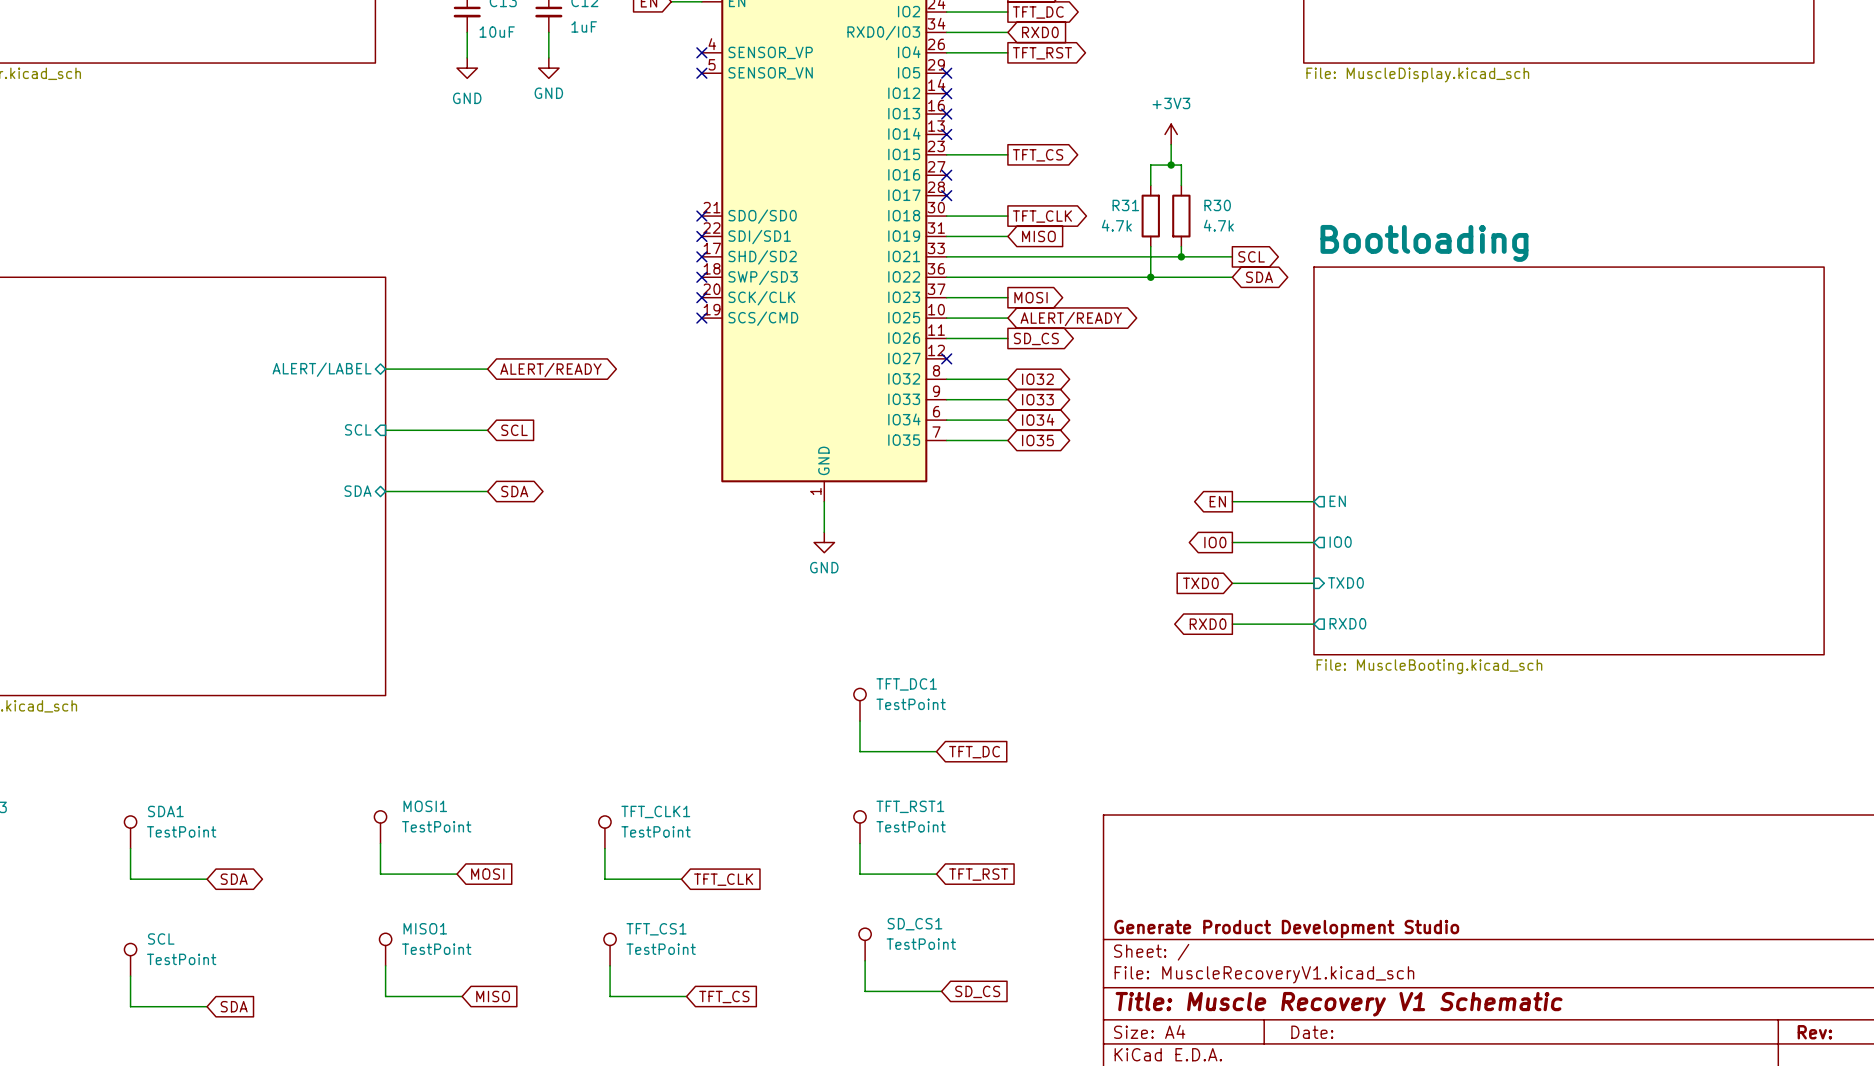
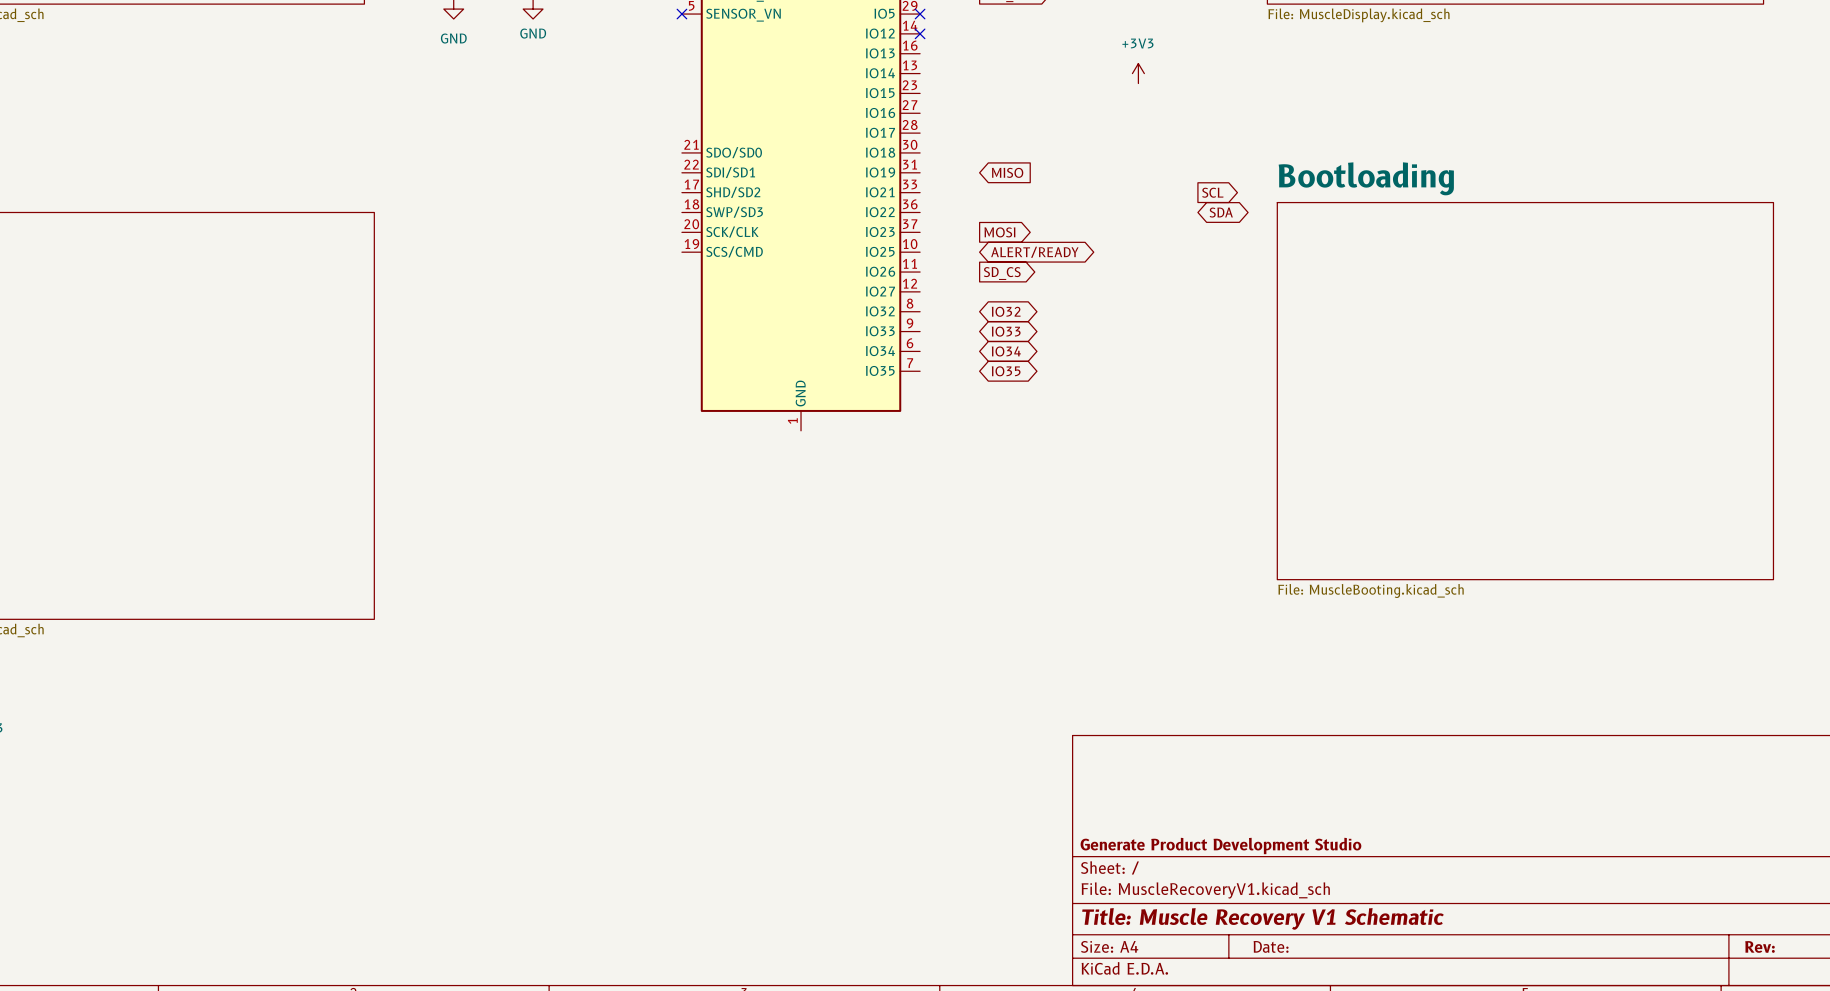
no-connect mark: (946, 114) -> none
no-connect mark: (946, 134) -> none
wire: (1171, 144) (1171, 165) -> none
wire: (946, 154) (1007, 154) -> none
global label: TFT_CS (1038, 155) -> none
junction: (1171, 165) -> none
no-connect mark: (946, 175) -> none
wire: (1150, 185) (1150, 165) (1181, 165) (1181, 185) -> none
no-connect mark: (946, 195) -> none
no-connect mark: (701, 216) -> none
wire: (946, 216) (1007, 216) -> none
global label: TFT_CLK (1042, 216) -> none
R31: 4.7k (1150, 216) -> none
R30: 4.7k (1181, 216) -> none
no-connect mark: (701, 236) -> none
wire: (946, 236) (1007, 236) -> none
wire: (1150, 246) (1150, 277) -> none
wire: (1181, 246) (1181, 256) -> none
no-connect mark: (701, 256) -> none
wire: (946, 256) (1232, 256) -> none
junction: (1181, 256) -> none
no-connect mark: (701, 277) -> none
wire: (946, 277) (1232, 277) -> none
junction: (1150, 277) -> none
no-connect mark: (701, 297) -> none
wire: (946, 297) (1007, 297) -> none
no-connect mark: (701, 318) -> none
wire: (946, 318) (1007, 318) -> none
wire: (946, 338) (1007, 338) -> none
no-connect mark: (946, 358) -> none
sheet pin: ALERT/LABEL (322, 369) -> none
wire: (385, 369) (487, 369) -> none
global label: ALERT/READY (550, 370) -> none
wire: (946, 379) (1007, 379) -> none
wire: (946, 399) (1007, 399) -> none
wire: (946, 420) (1007, 420) -> none
sheet pin: SCL (358, 429) -> none
wire: (385, 430) (487, 430) -> none
global label: SCL (514, 430) -> none
wire: (946, 440) (1007, 440) -> none
sheet pin: SDA (358, 491) -> none
wire: (385, 491) (487, 491) -> none
global label: SDA (514, 491) -> none
wire: (824, 501) (824, 532) -> none
global label: EN (1217, 501) -> none
wire: (1232, 501) (1313, 501) -> none
sheet pin: EN (1337, 501) -> none
power symbol: GND (824, 542) -> none
global label: IO0 (1215, 542) -> none
wire: (1232, 542) (1313, 542) -> none
sheet pin: IO0 (1340, 542) -> none
sheet pin: TXD0 (1345, 582) -> none
global label: TXD0 (1200, 583) -> none
wire: (1232, 583) (1313, 583) -> none
sheet pin: RXD0 (1347, 623) -> none
global label: RXD0 (1208, 624) -> none
wire: (1232, 624) (1313, 624) -> none
TFT_DC1: TestPoint (860, 704) -> none
wire: (860, 721) (860, 751) (936, 751) -> none
global label: TFT_DC (974, 752) -> none
MOSI1: TestPoint (380, 827) -> none
TFT_RST1: TestPoint (860, 827) -> none
SDA1: TestPoint (130, 832) -> none
TFT_CLK1: TestPoint (604, 832) -> none
wire: (380, 843) (380, 874) (457, 874) -> none
wire: (860, 843) (860, 874) (936, 874) -> none
wire: (130, 848) (130, 879) (207, 879) -> none
wire: (604, 848) (604, 879) (681, 879) -> none
global label: MOSI (487, 874) -> none
global label: TFT_RST (978, 874) -> none
global label: SDA (234, 879) -> none
global label: TFT_CLK (723, 879) -> none
SD_CS1: TestPoint (865, 944) -> none
MISO1: TestPoint (385, 949) -> none
TFT_CS1: TestPoint (610, 949) -> none
SCL: TestPoint (130, 959) -> none
wire: (865, 960) (865, 991) (941, 991) -> none
wire: (385, 965) (385, 996) (462, 996) -> none
wire: (610, 965) (610, 996) (686, 996) -> none
wire: (130, 976) (130, 1006) (207, 1006) -> none
global label: SD_CS (977, 991) -> none
global label: MISO (493, 996) -> none
global label: TFT_CS (724, 996) -> none
global label: SDA (234, 1006) -> none

